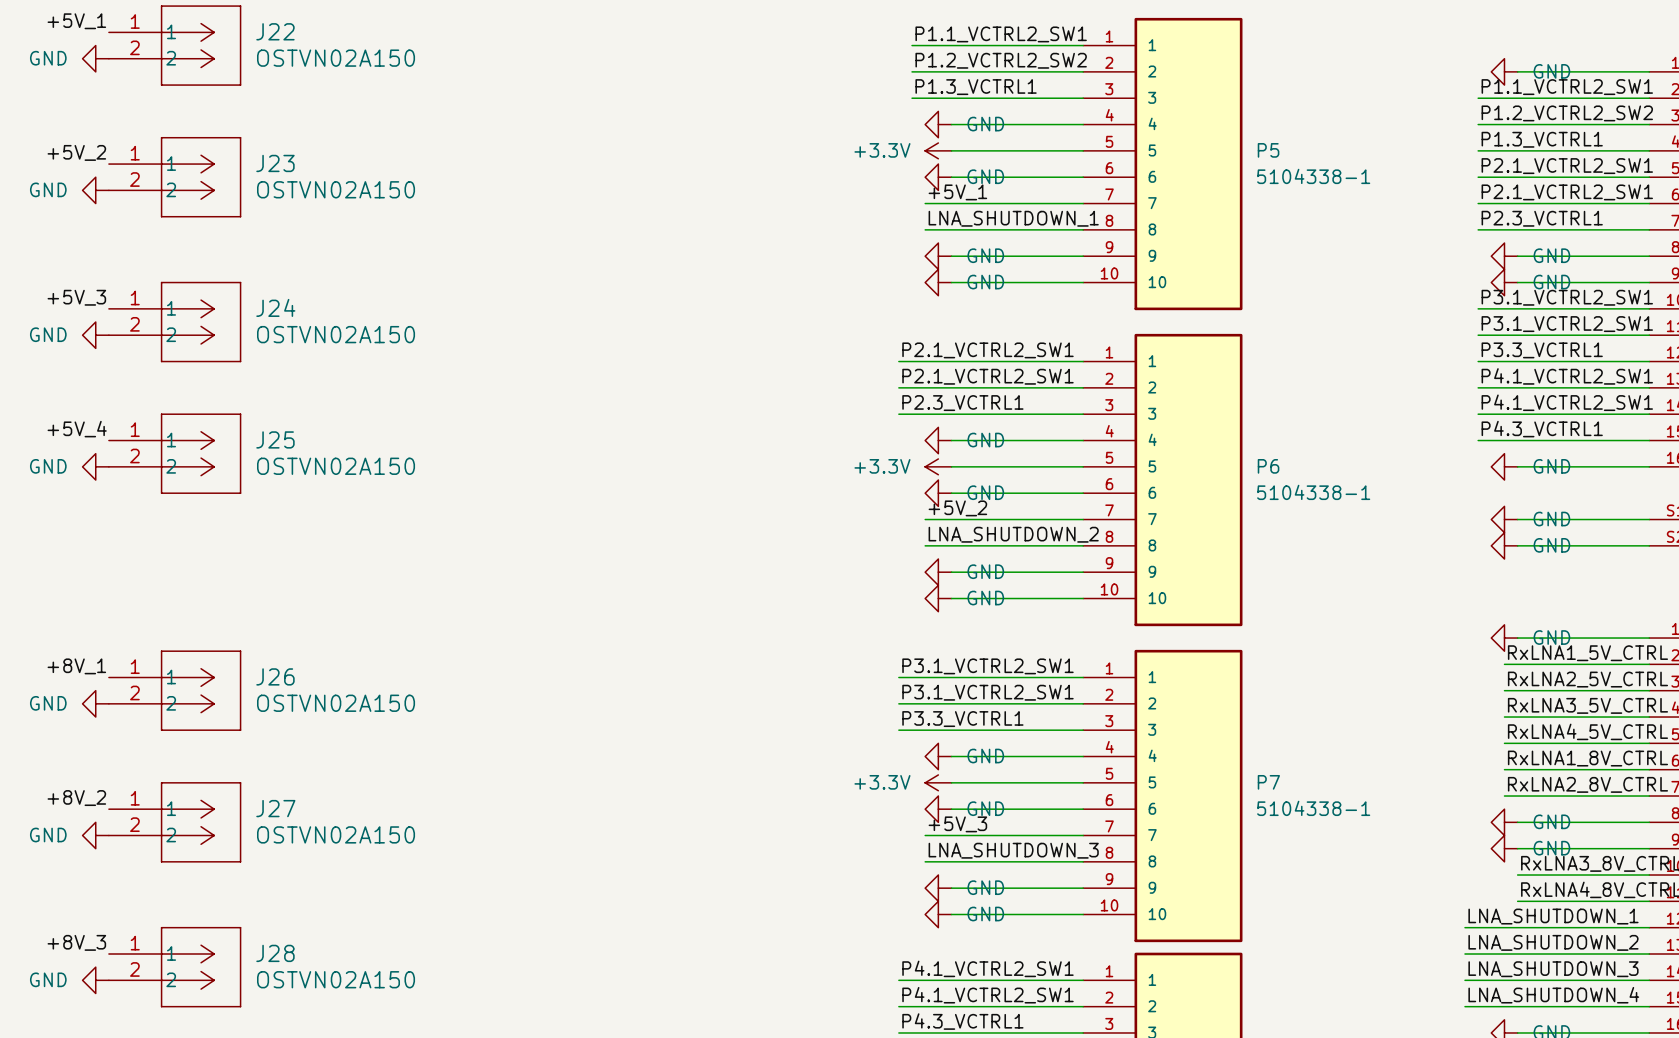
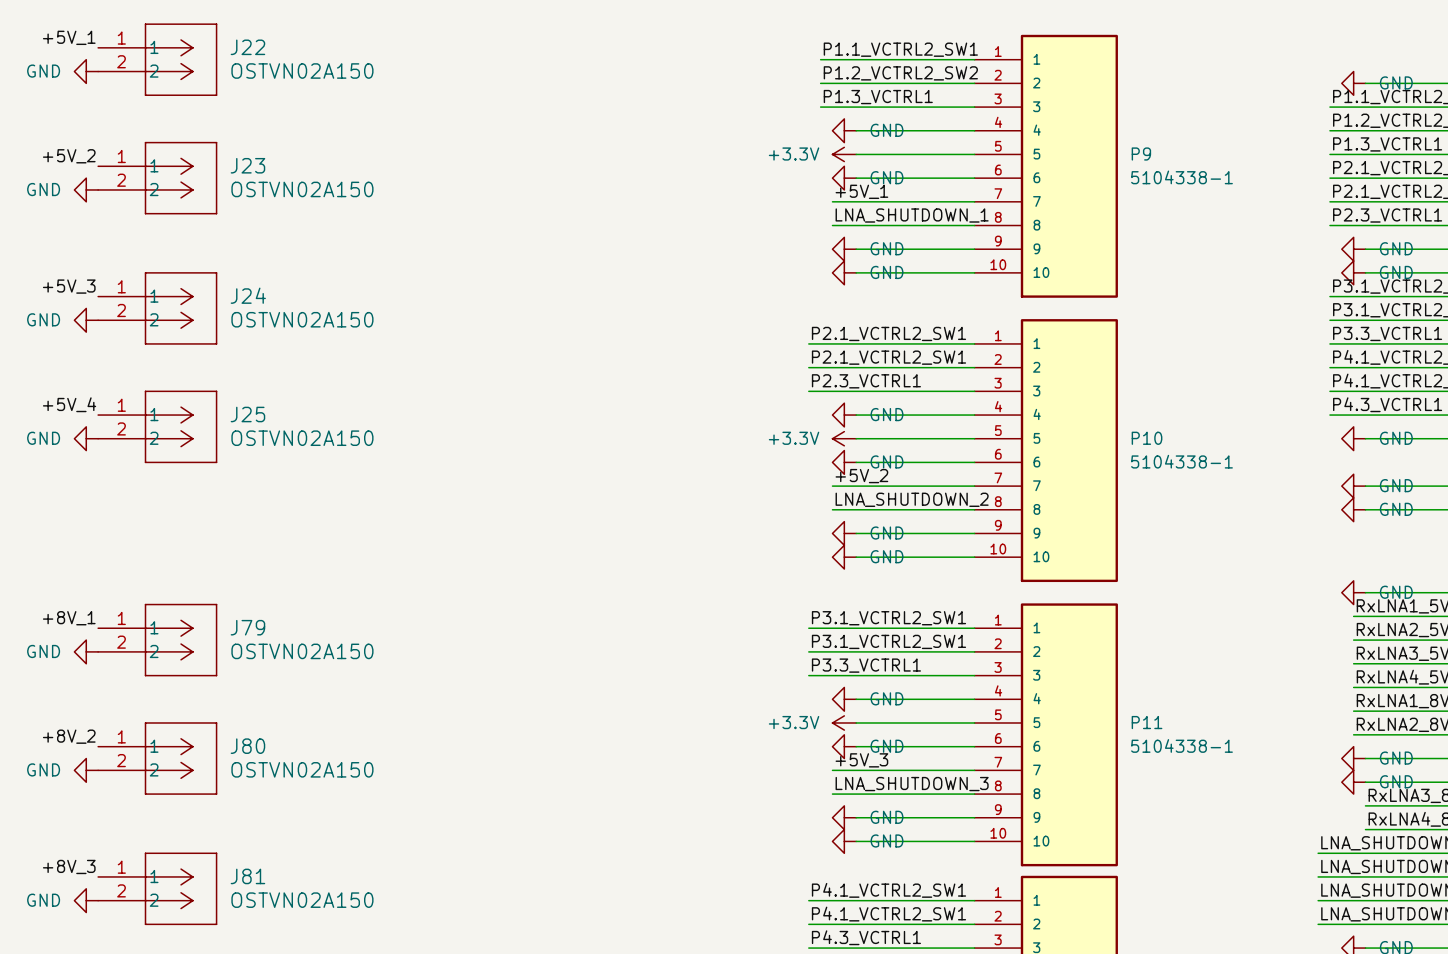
P5 name: P5 (1268, 150) -> P9 (1141, 154)
P6 name: P6 (1268, 466) -> P10 (1147, 438)
J26 name: J26 (275, 676) -> J79 (247, 627)
P7 name: P7 (1268, 782) -> P11 (1147, 722)
J27 name: J27 (275, 808) -> J80 (247, 746)
J28 name: J28 (275, 953) -> J81 (247, 876)

